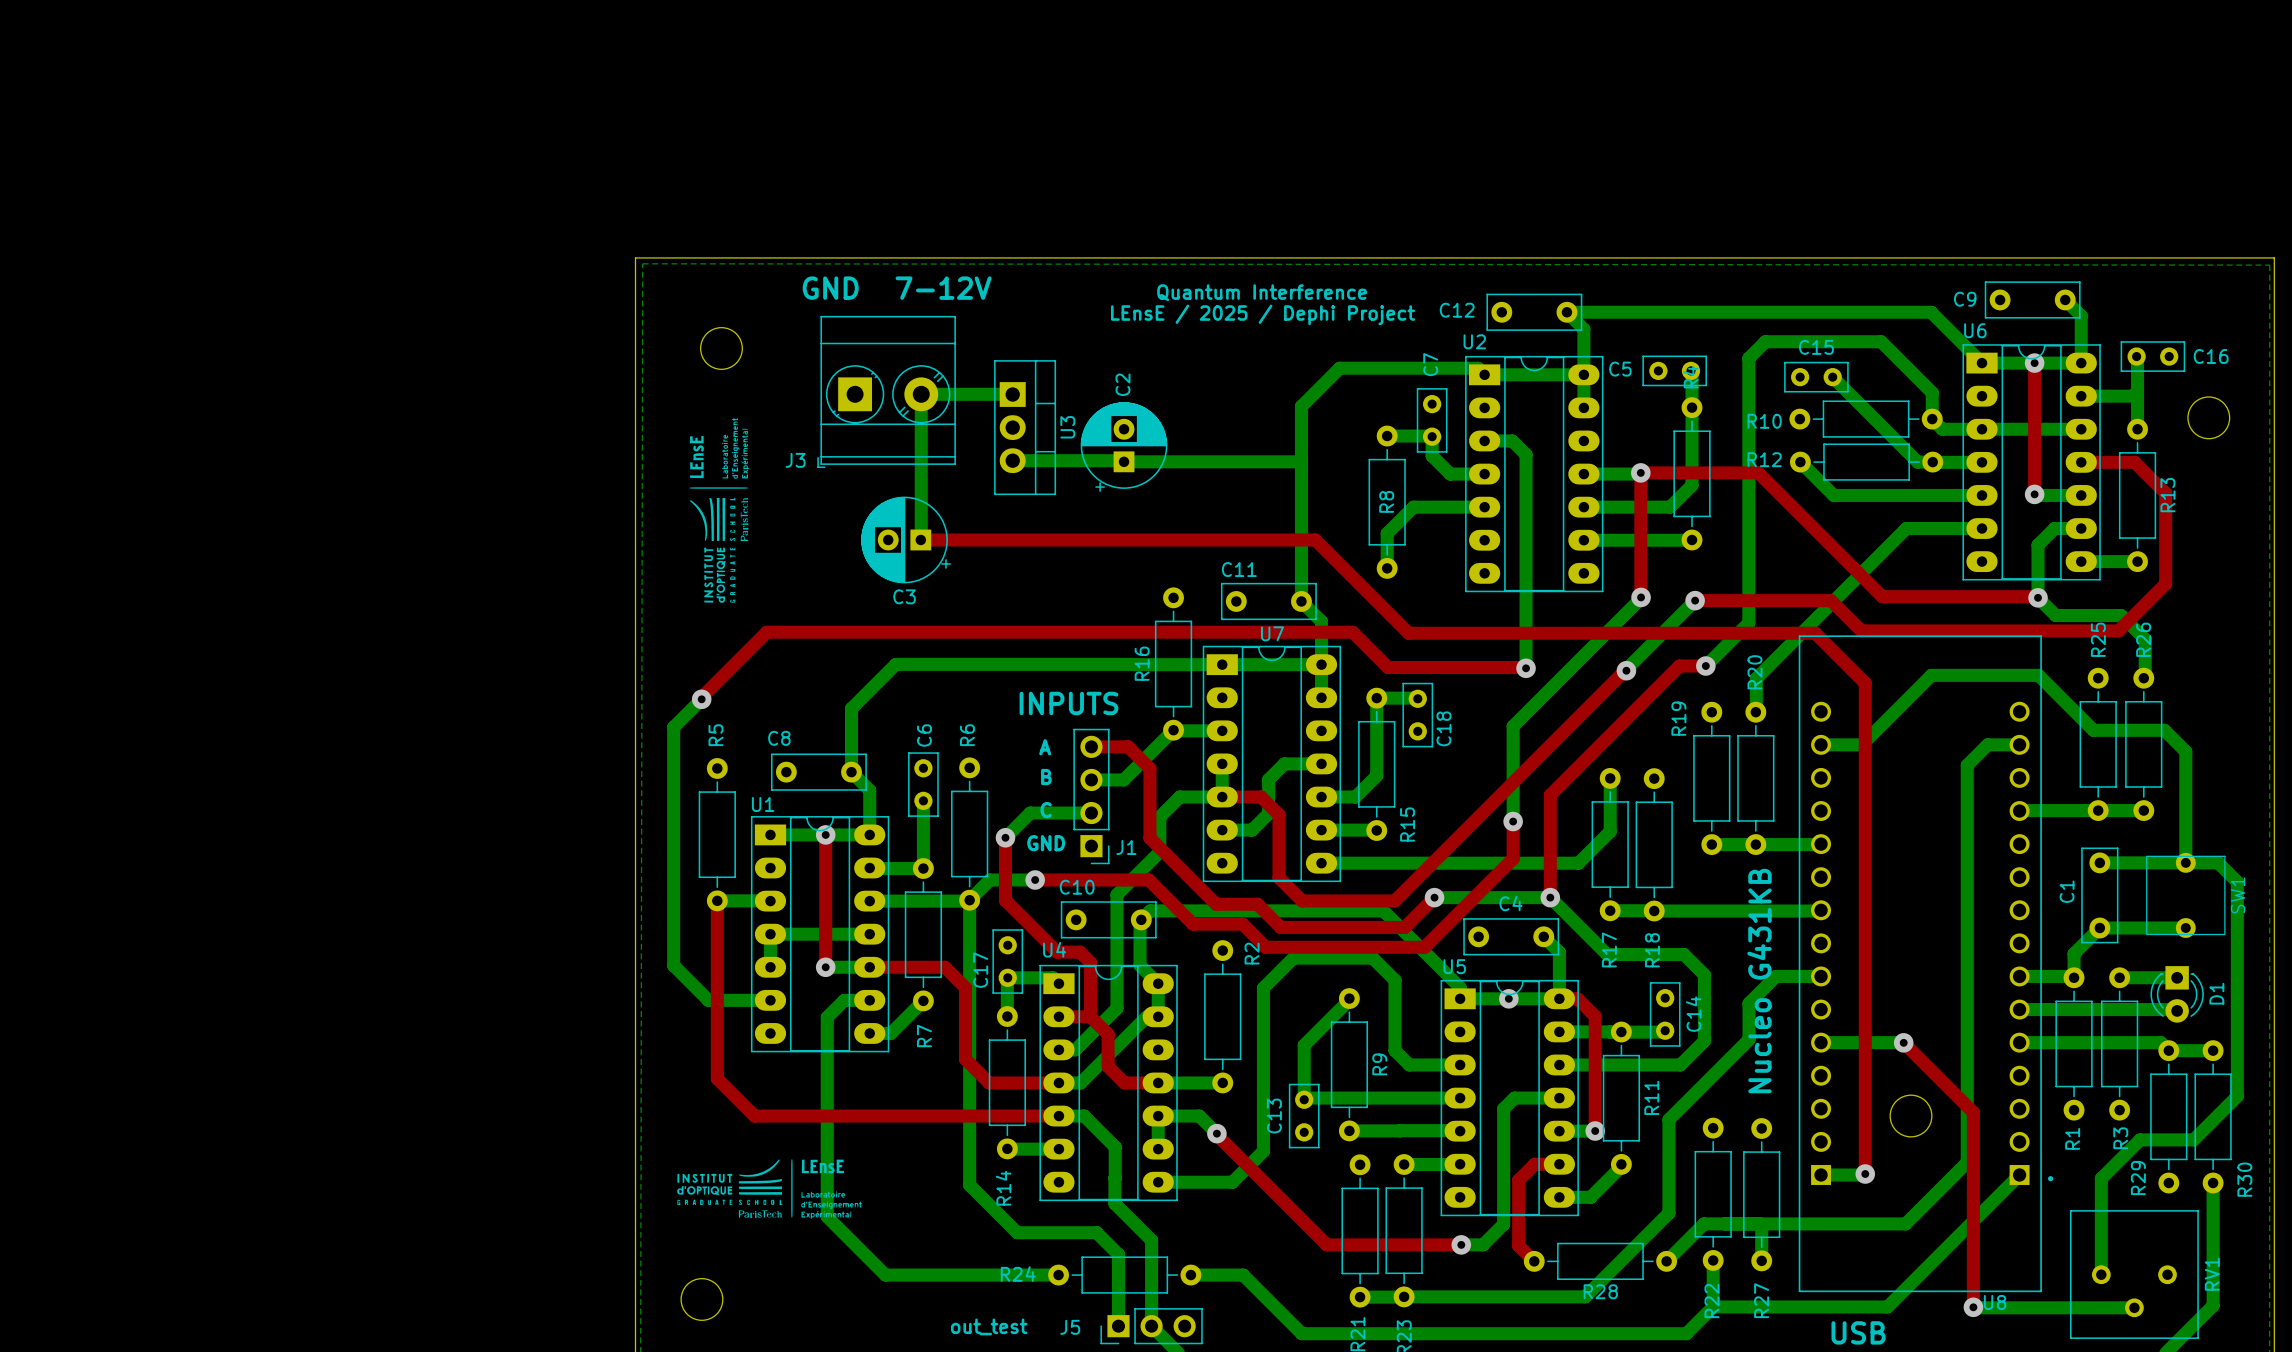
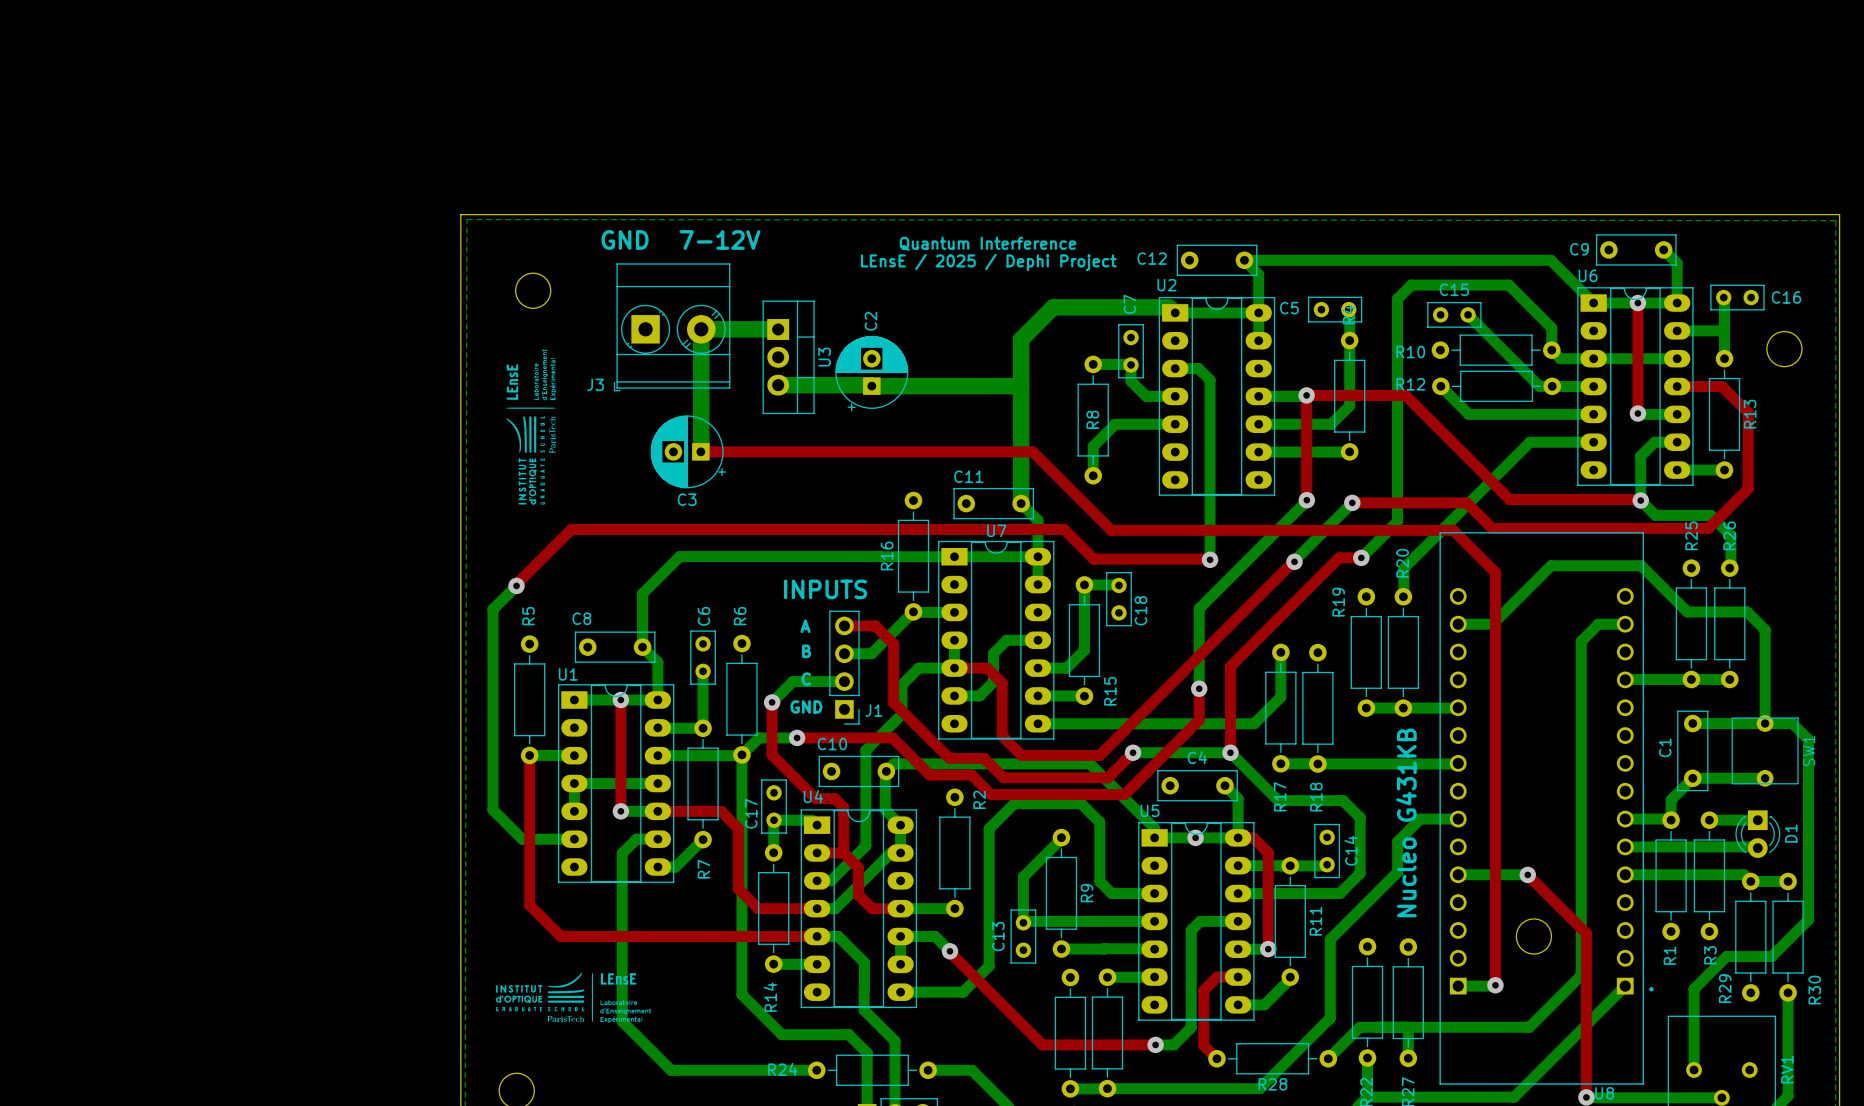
bottom track width: thin (1478, 368) (1339, 368) (1301, 406) (1301, 601) -> thick (1169, 307) (1053, 307) (1021, 339) (1021, 503)
bottom track width: thin (1012, 394) (921, 394) (921, 539) -> thick (778, 329) (701, 329) (701, 451)
bottom track width: thin (1012, 460) (1122, 460) -> thick (778, 385) (870, 385)
bottom track width: thin (1124, 461) (1301, 461) -> thick (871, 386) (1021, 386)

